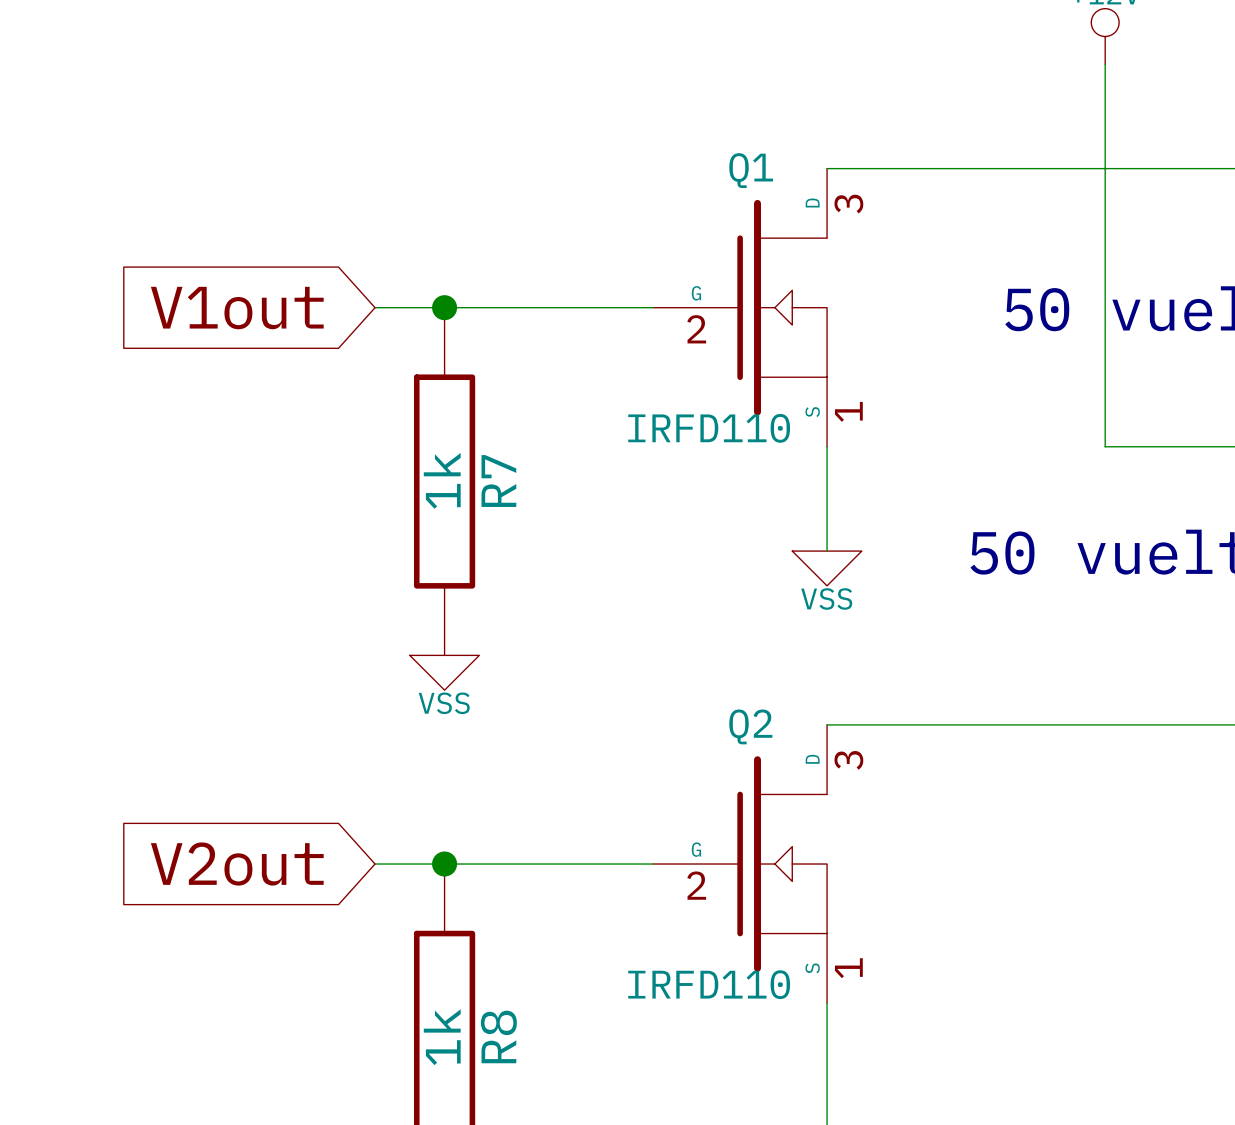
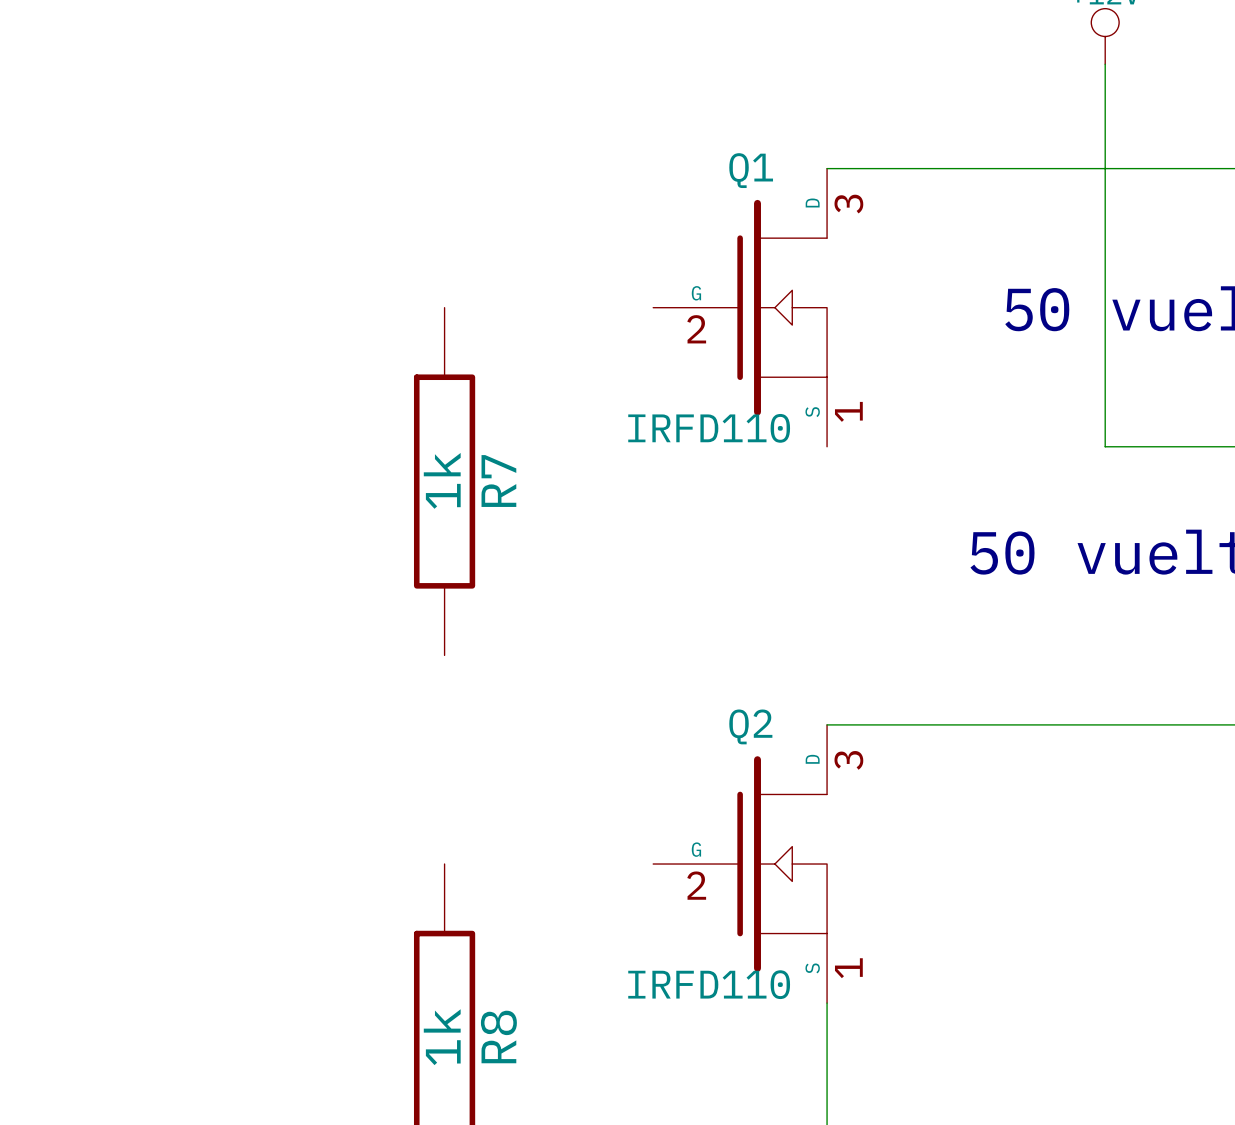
wire: (375, 307) (653, 307) -> none
junction: (444, 307) -> none
global label: V1out (237, 308) -> none
wire: (827, 446) (827, 551) -> none
power symbol: VSS (827, 568) -> none
power symbol: VSS (444, 672) -> none
global label: V2out (237, 864) -> none
wire: (375, 864) (653, 864) -> none
junction: (444, 864) -> none

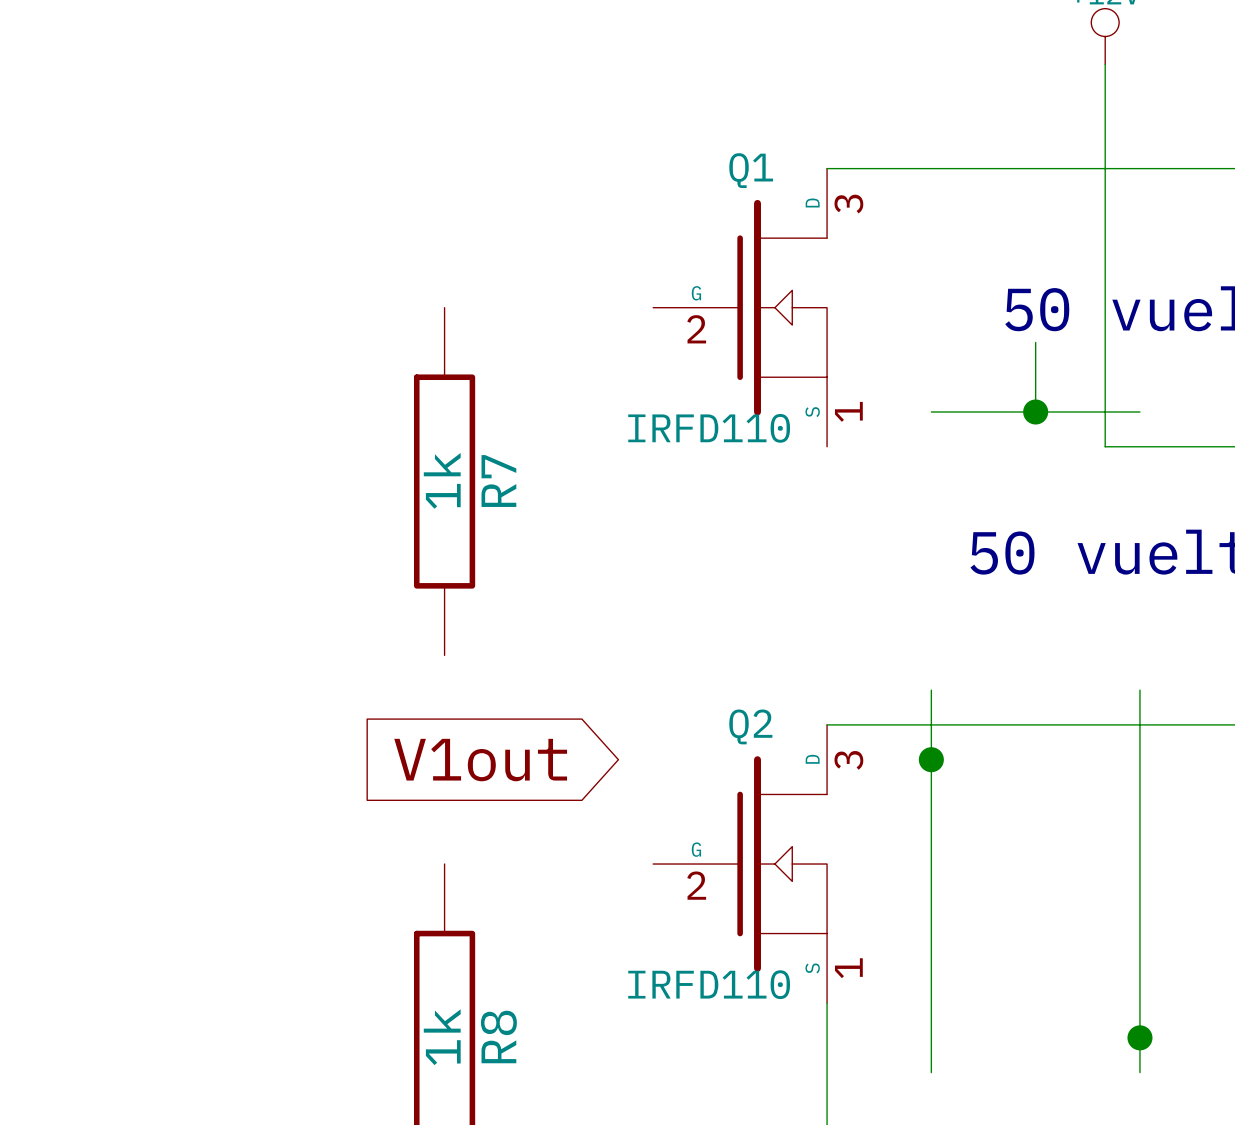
wire: none -> (1035, 342) (1035, 412)
wire: none -> (931, 412) (1139, 412)
junction: none -> (1035, 412)
wire: none -> (931, 690) (931, 1072)
wire: none -> (1139, 690) (1139, 1072)
junction: none -> (931, 759)
global label: none -> V1out (480, 760)
junction: none -> (1139, 1037)

